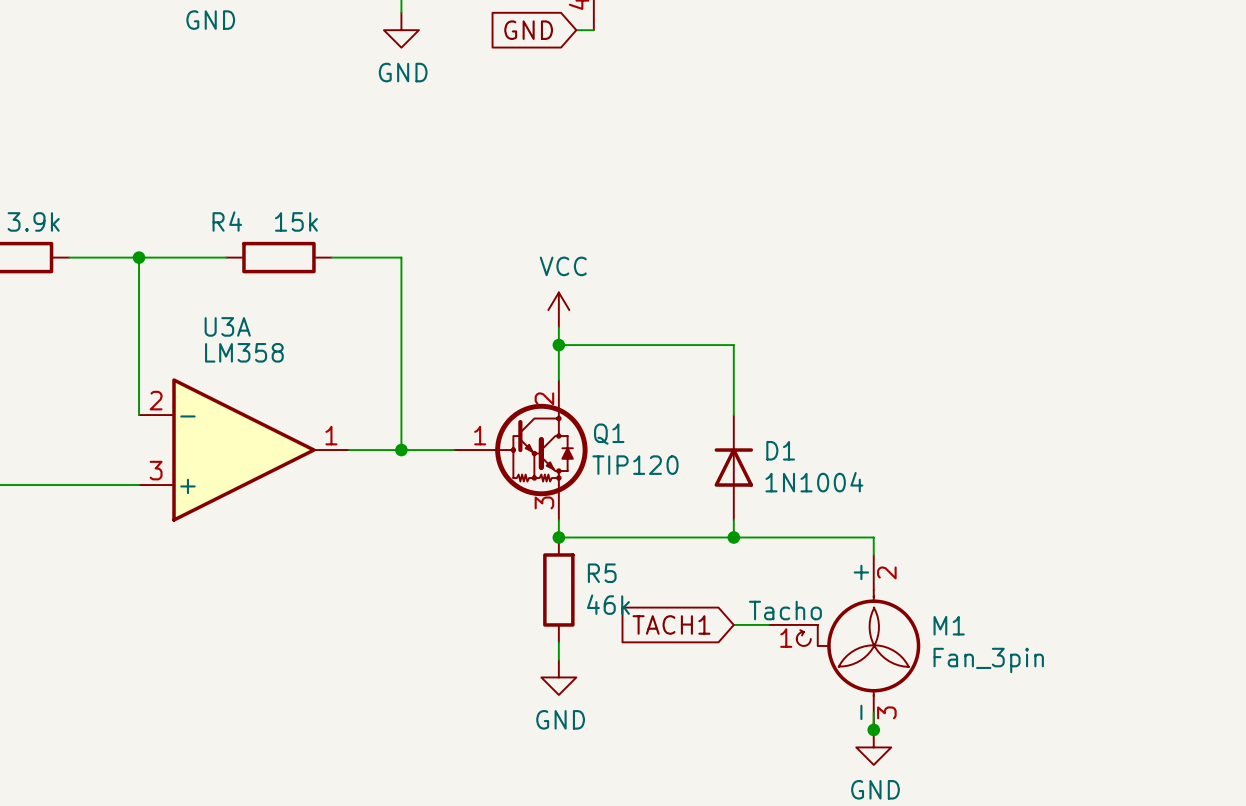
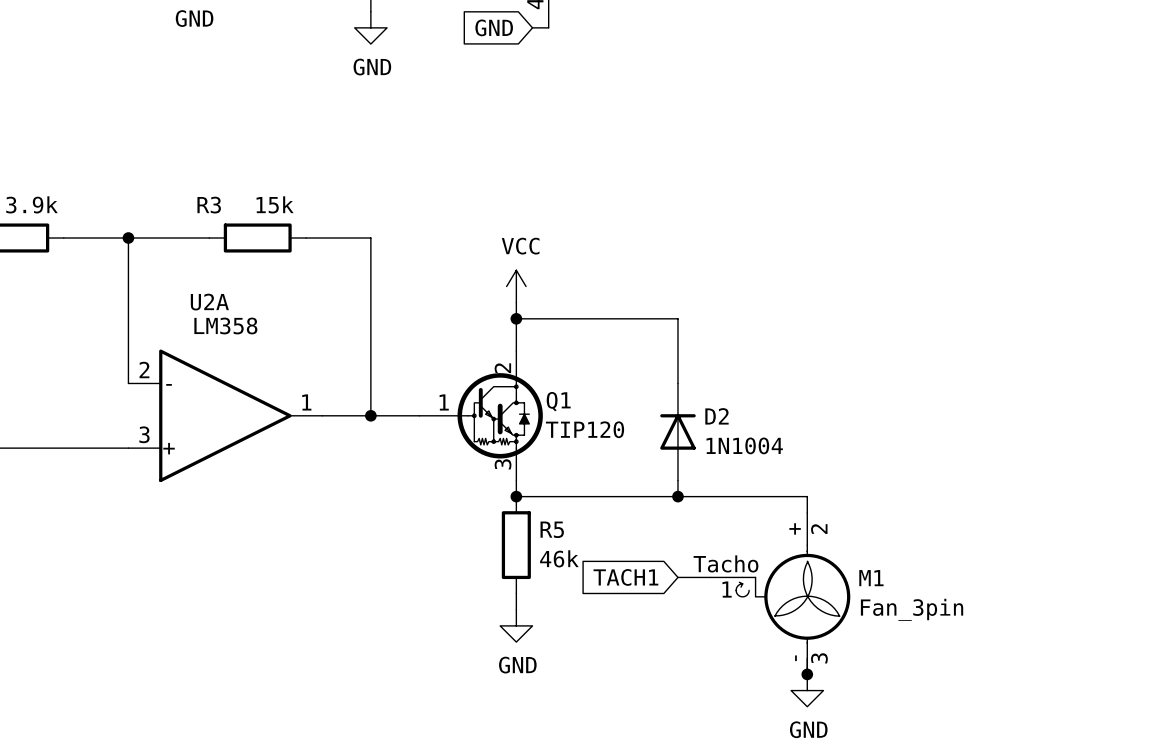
R4 name: R4 (227, 221) -> R3 (209, 205)
U3A name: U3A (227, 326) -> U2A (209, 302)
D1 name: D1 (780, 450) -> D2 (716, 416)

